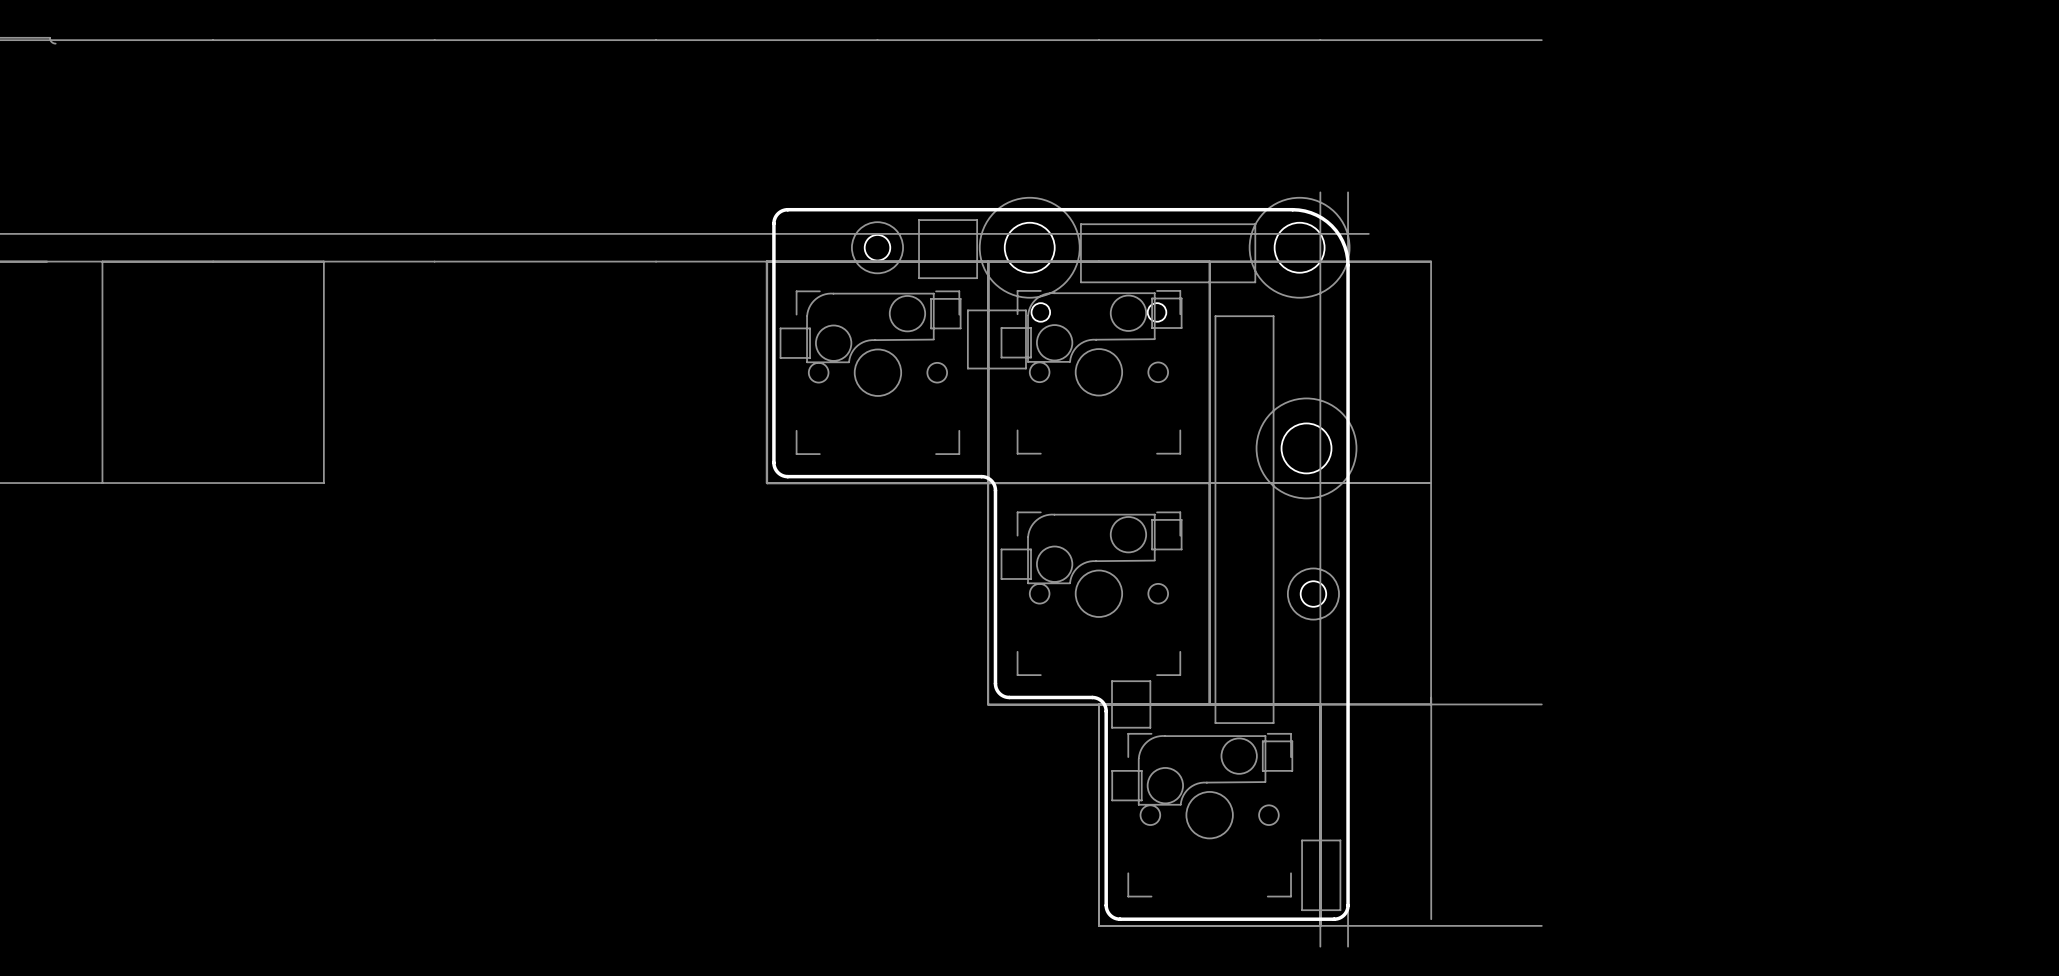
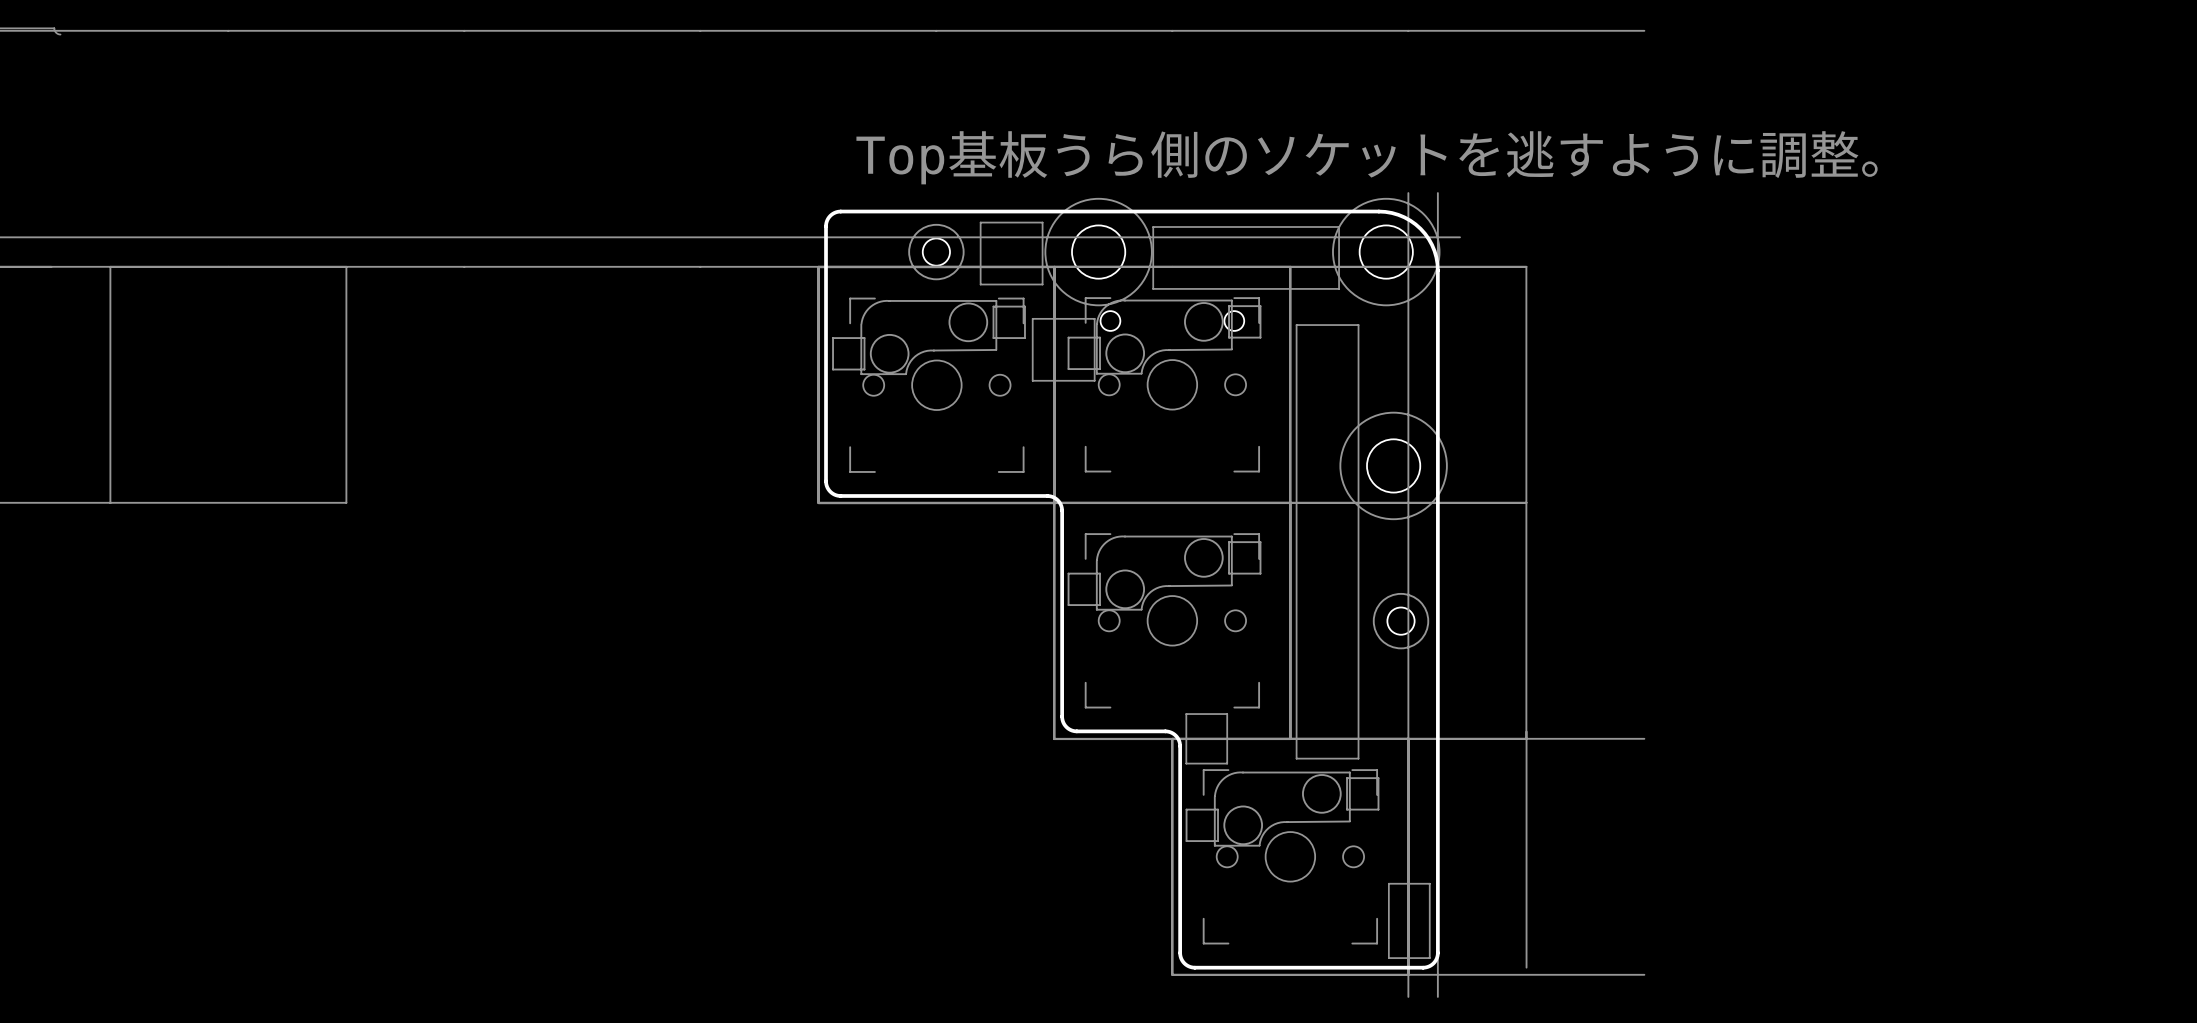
text: none -> Top基板うら側のソケットを逃すように調整。 (1367, 157)

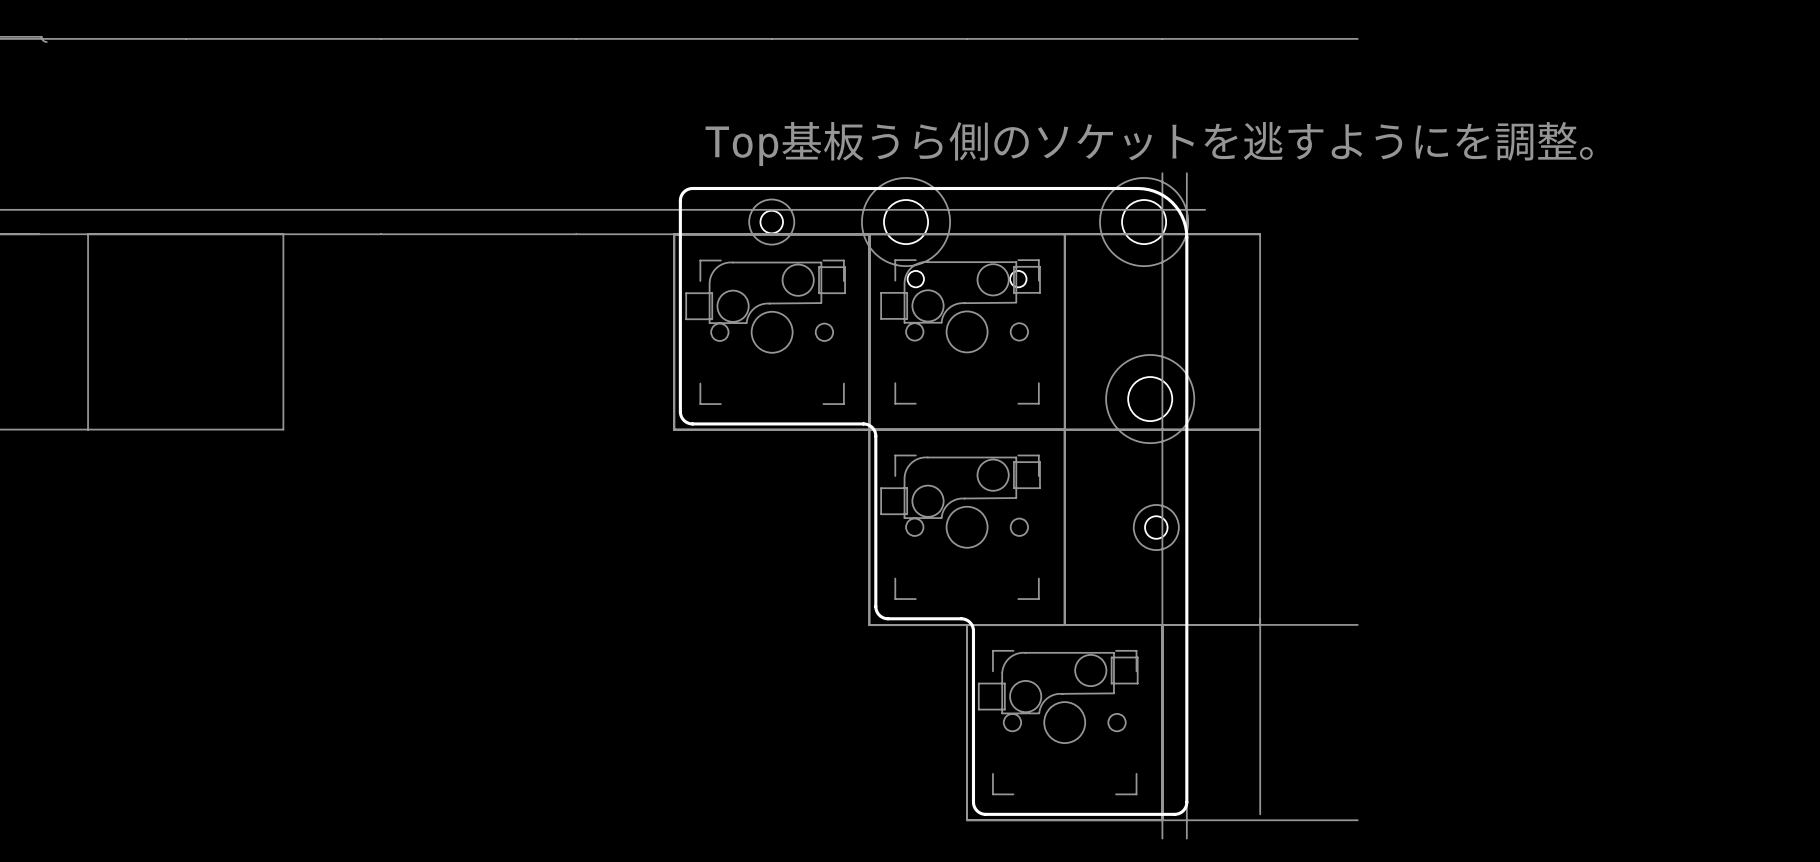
text: Top基板うら側のソケットを逃すように調整。 (1367, 157) -> Top基板うら側のソケットを逃すようにを調整。 (1149, 143)
line: (980, 222) (1042, 222) (1042, 284) (980, 284) (980, 222) -> none
line: (1153, 227) (1339, 227) (1339, 288) (1153, 288) (1153, 227) -> none
line: (1032, 318) (1094, 318) (1094, 380) (1032, 380) (1032, 318) -> none
line: (1296, 325) (1358, 325) (1358, 758) (1296, 758) (1296, 325) -> none
line: (1186, 714) (1227, 714) (1227, 763) (1186, 763) (1186, 714) -> none
line: (1388, 883) (1429, 883) (1429, 958) (1388, 958) (1388, 883) -> none

